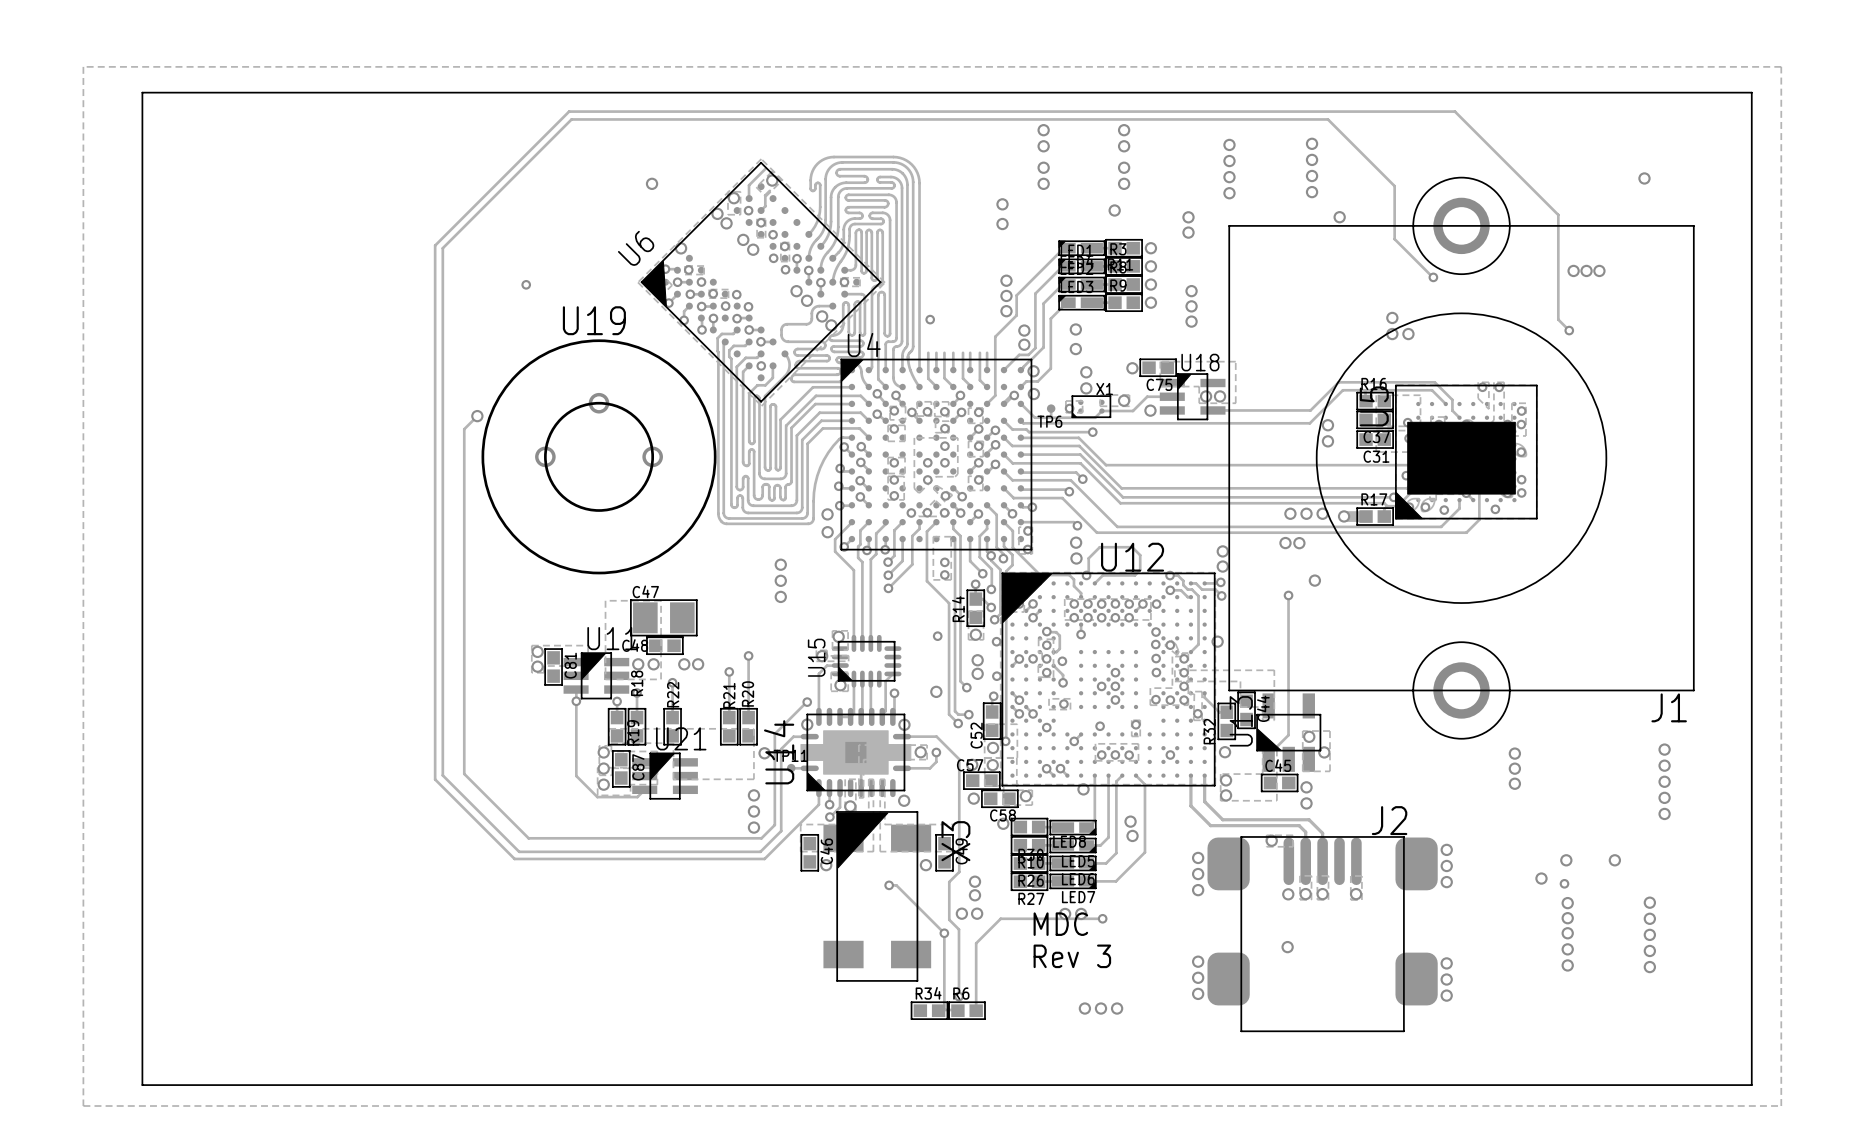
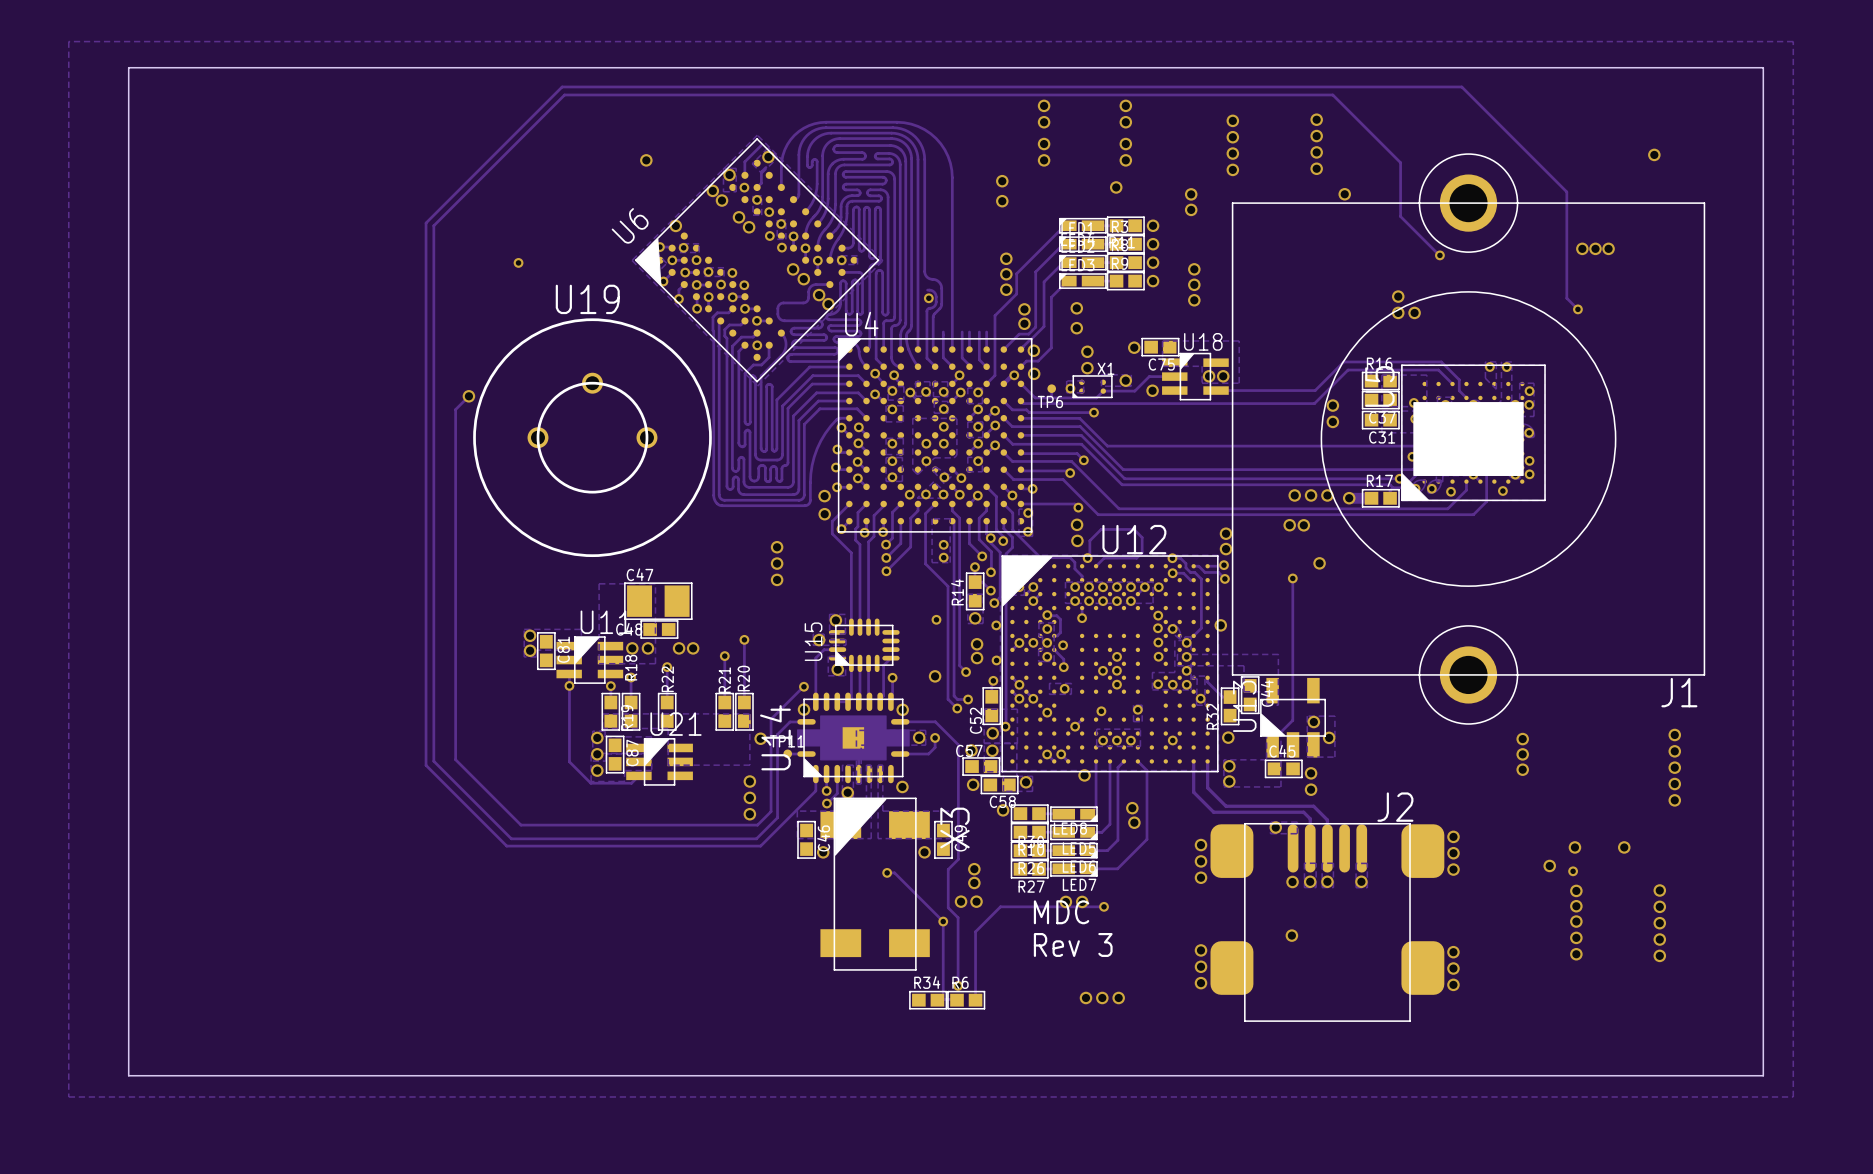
track: none -> (781, 187) (781, 161) (784, 149) (794, 135) (809, 125) (826, 122) (904, 122) (918, 126) (930, 133) (944, 149) (951, 170) (952, 332)
track: none -> (927, 290) (934, 292) (936, 301) (934, 306) (927, 310) (926, 332)
track: (936, 352) (936, 370) -> (793, 199) (798, 194) (799, 147) (804, 138) (812, 131) (826, 127) (892, 127) (905, 130) (915, 137) (922, 147) (924, 155) (924, 272) (928, 278) (939, 281) (941, 287) (941, 305) (933, 316) (933, 347) (935, 349)

